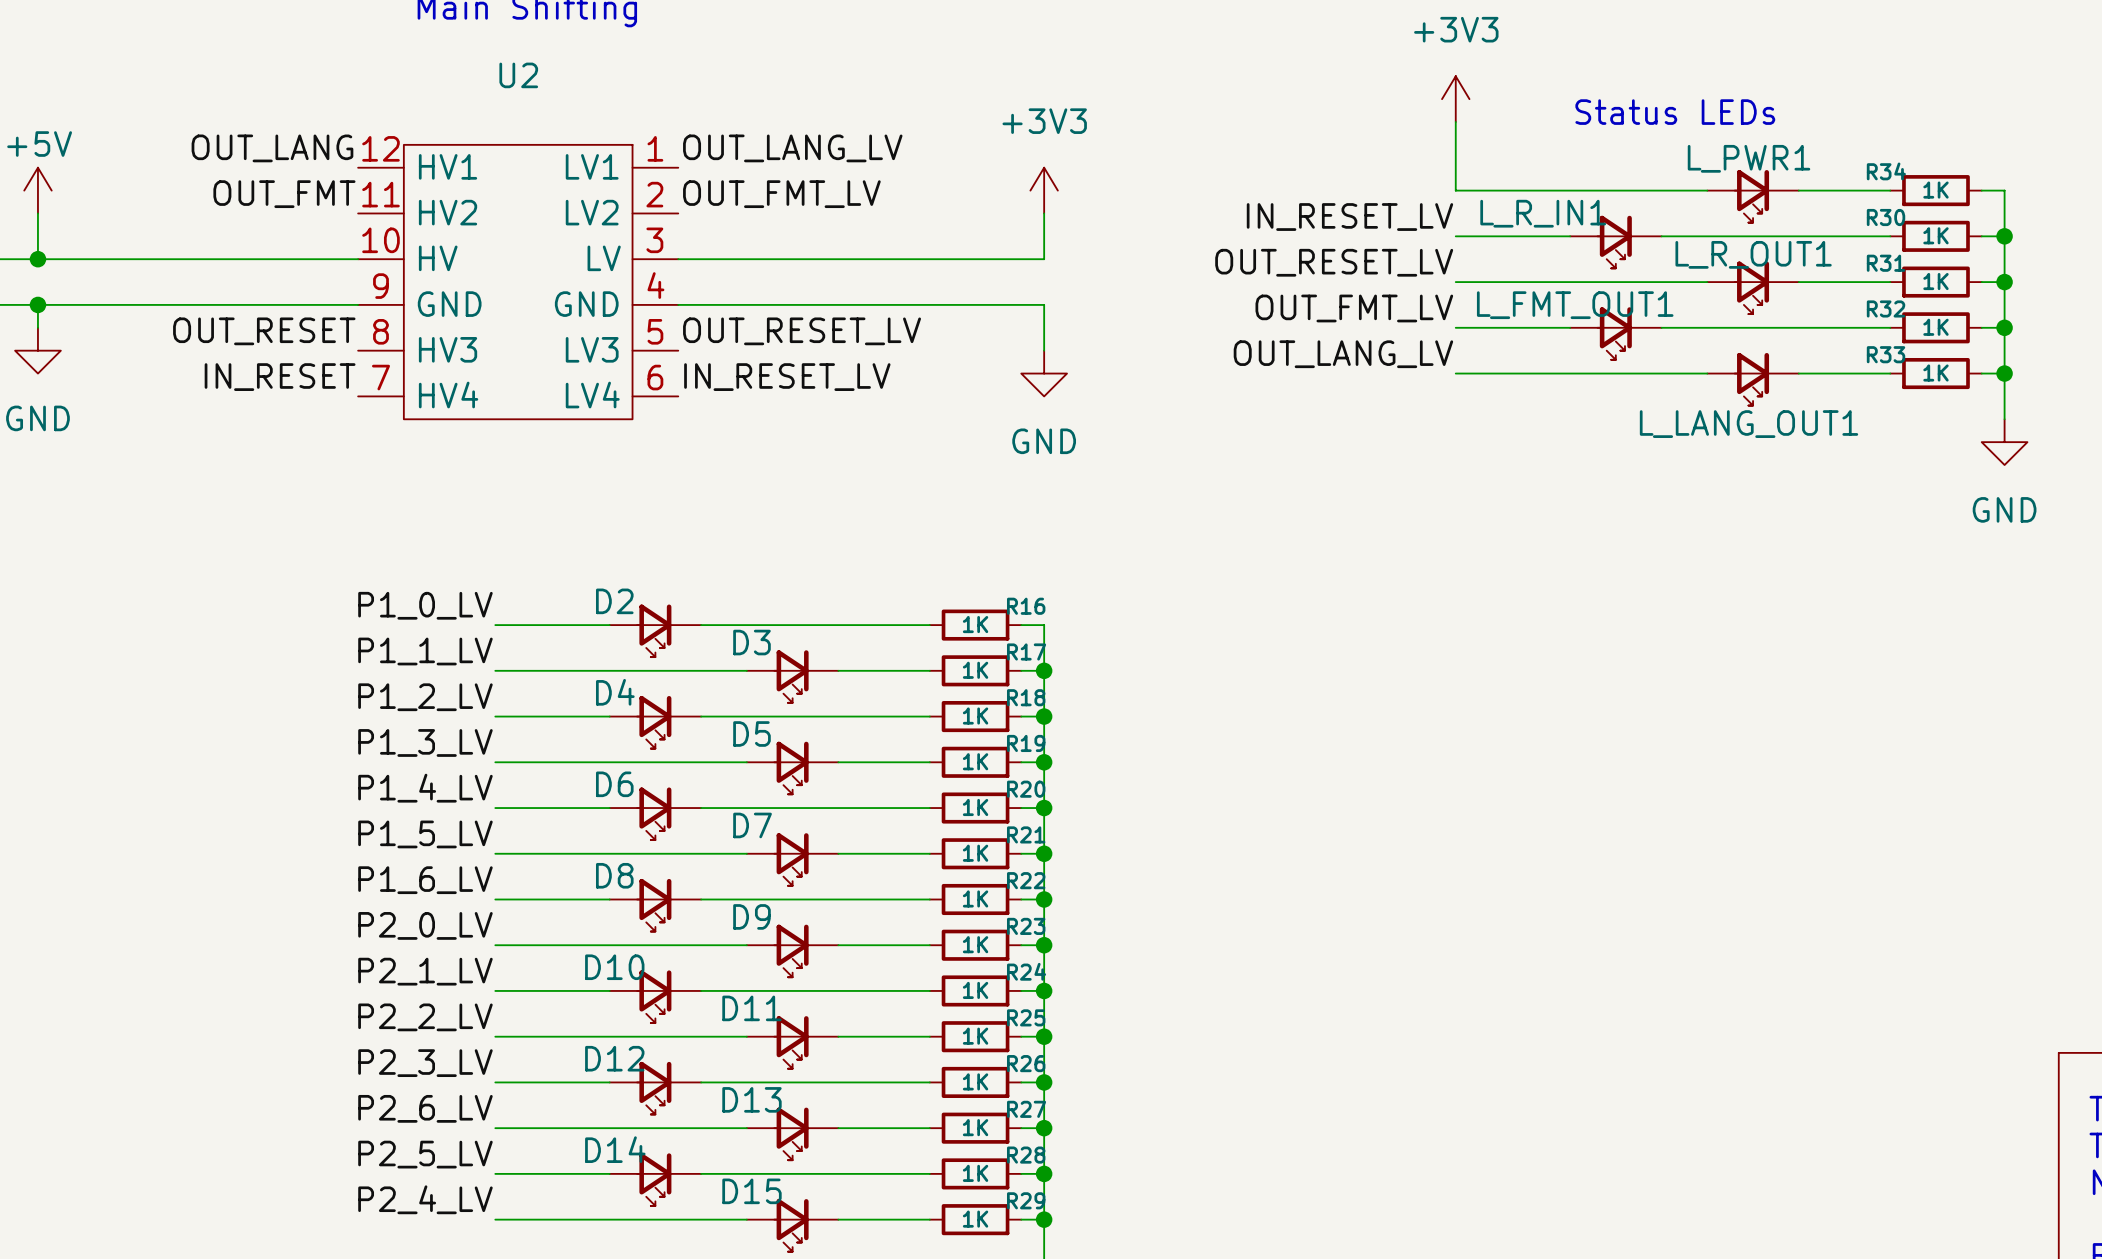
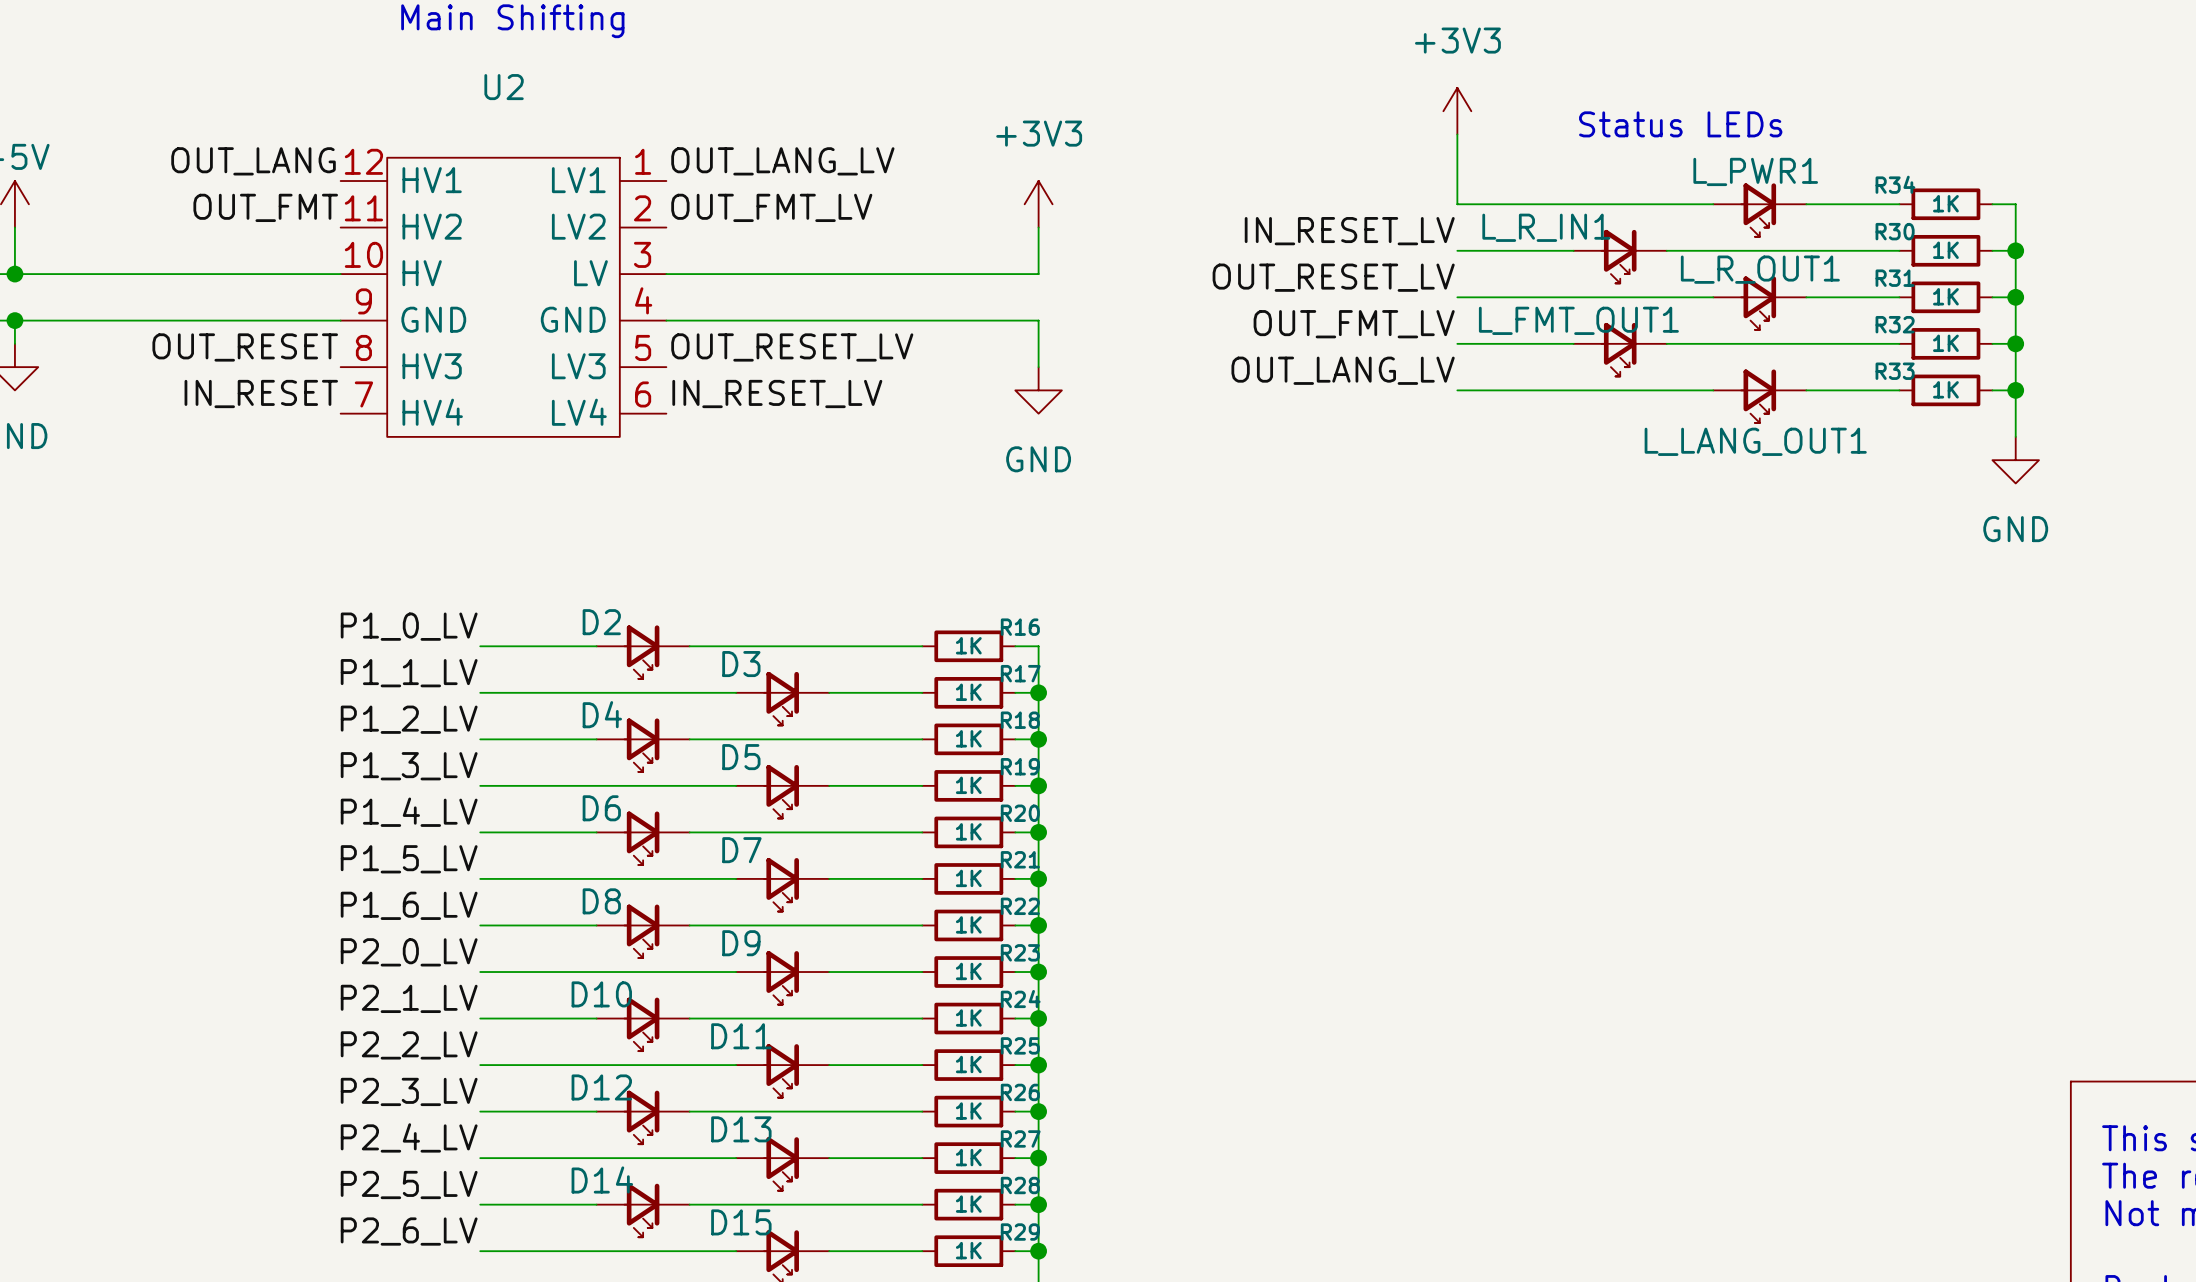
label: P2_6_LV (425, 1108) -> P2_4_LV (409, 1137)
label: P2_4_LV (425, 1199) -> P2_6_LV (409, 1231)

